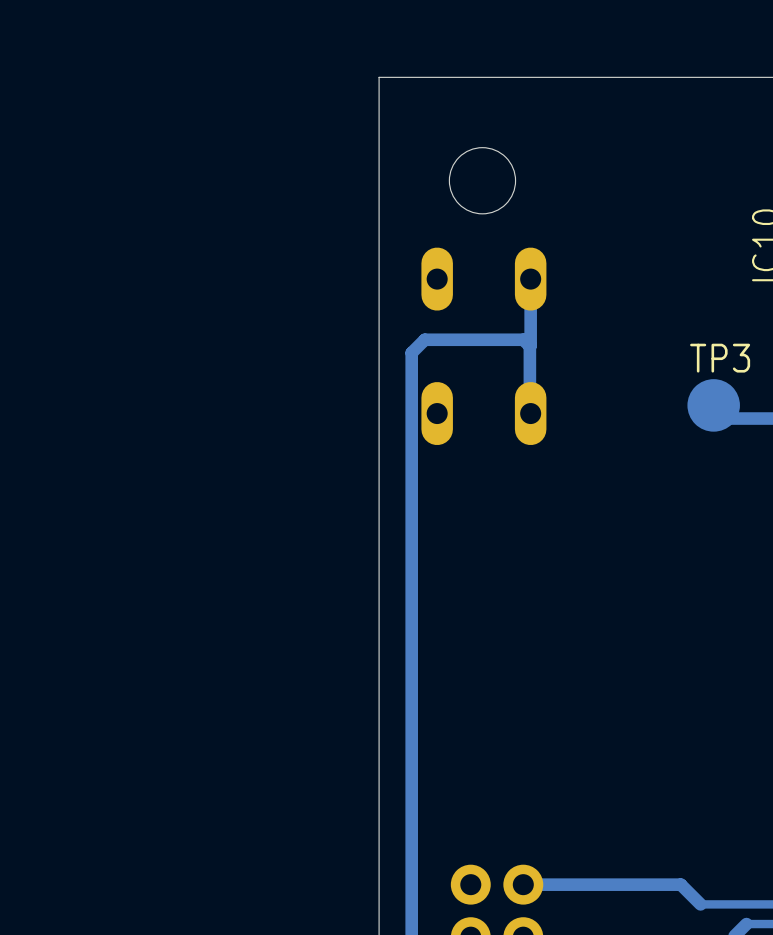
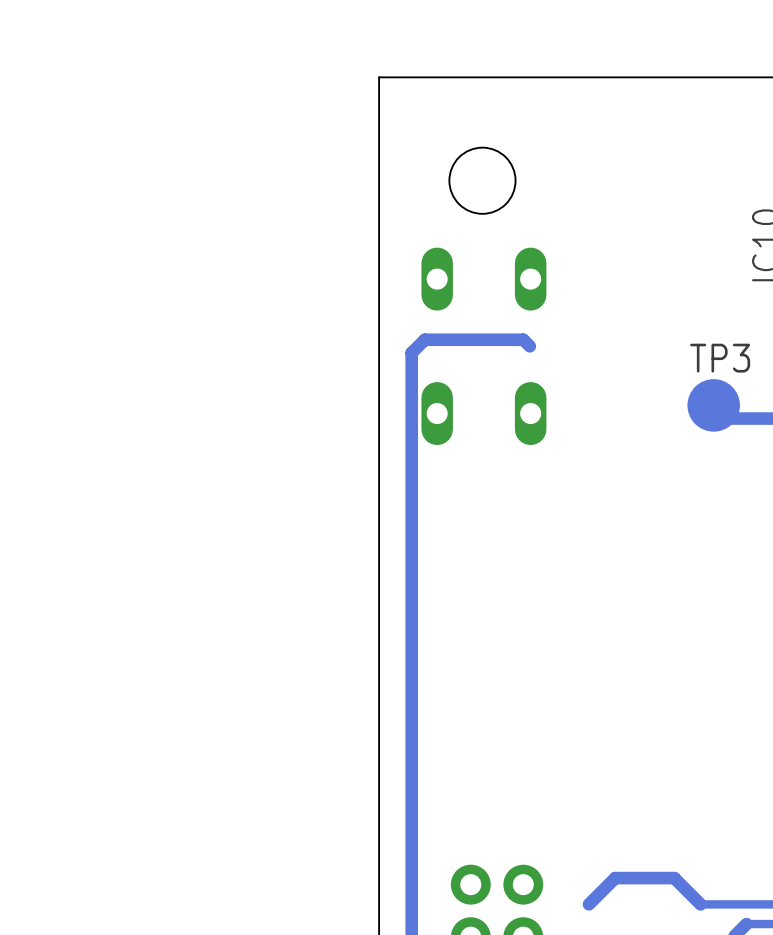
track: (530, 279) (530, 413) -> none
track: (680, 884) (523, 884) -> (680, 884) (674, 878) (615, 878) (588, 904)

